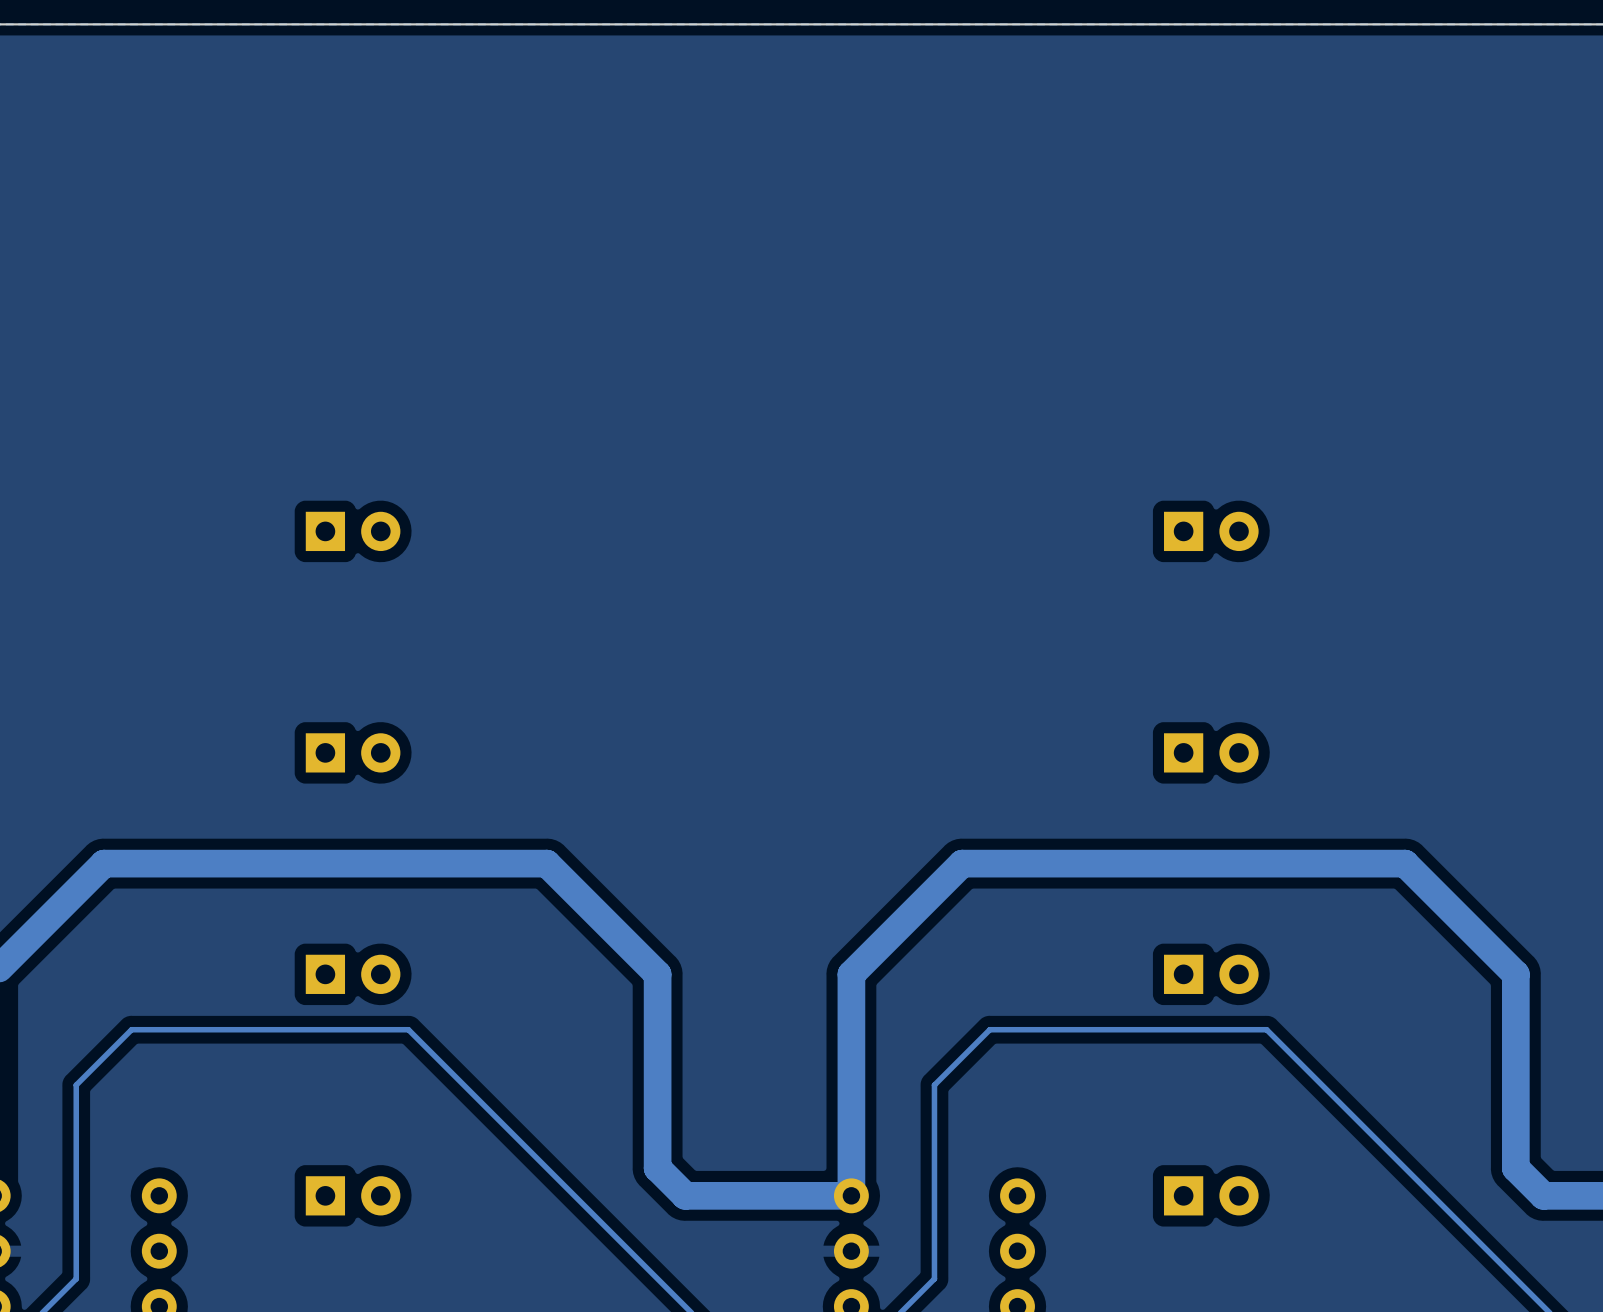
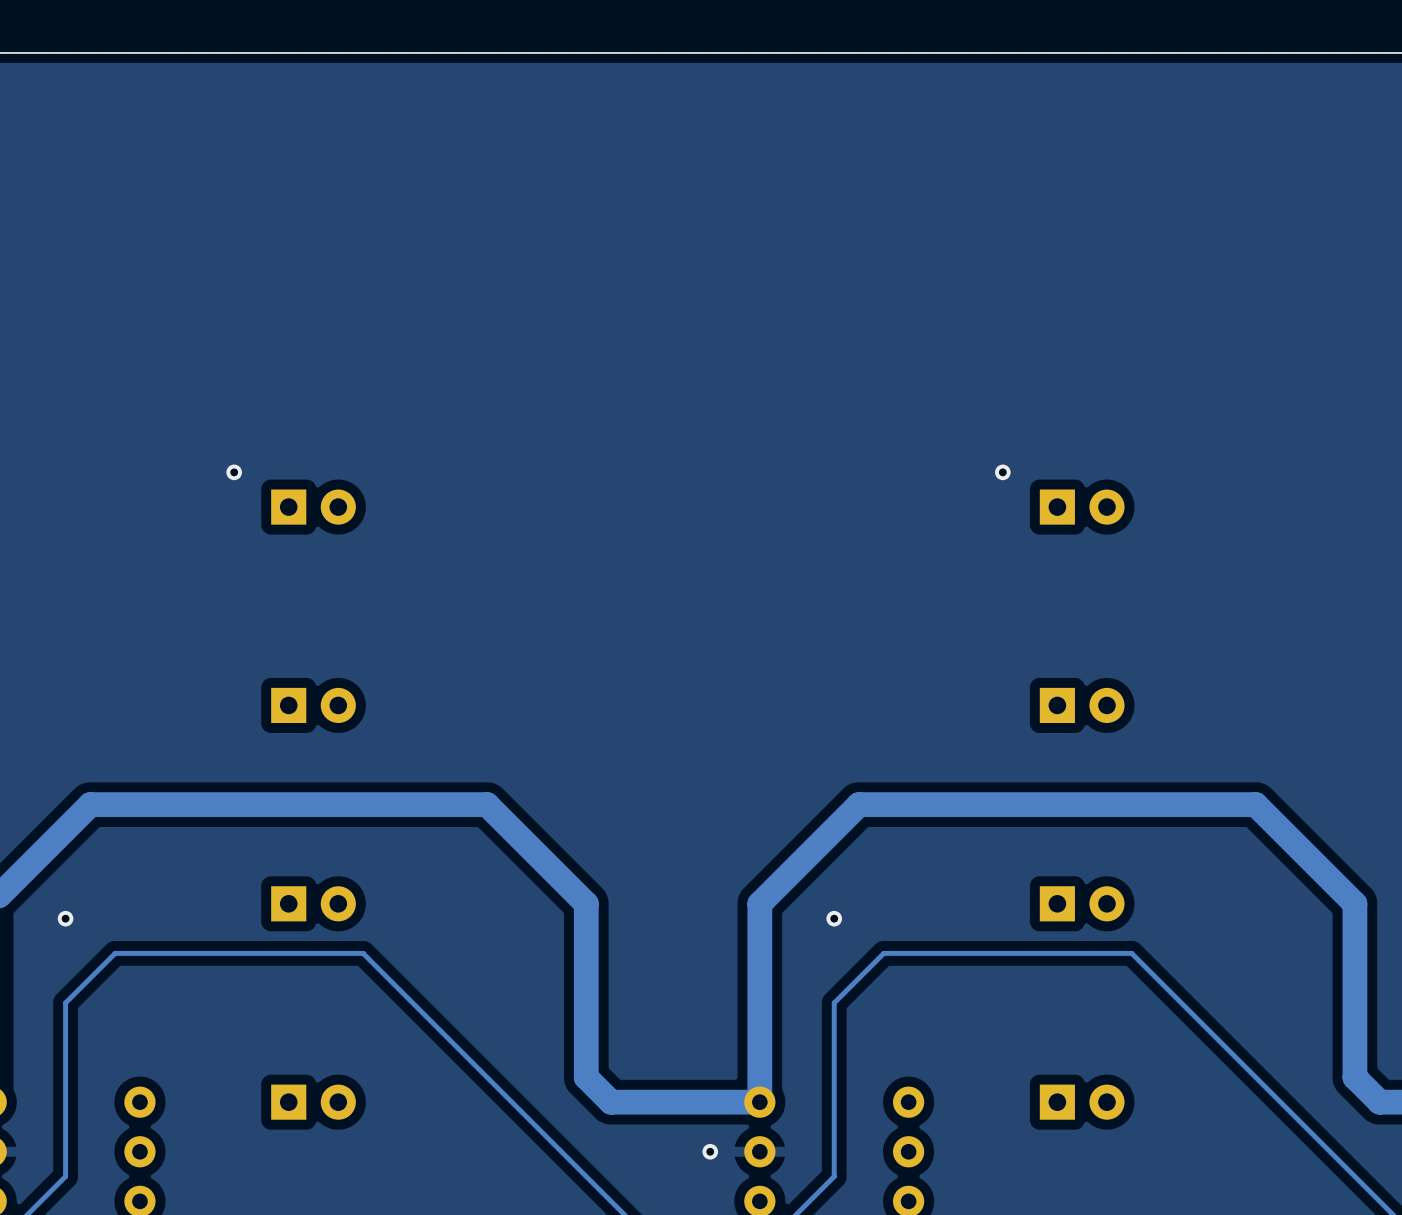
via: none -> (234, 472)
via: none -> (1002, 472)
via: none -> (65, 918)
via: none -> (834, 918)
via: none -> (710, 1151)

